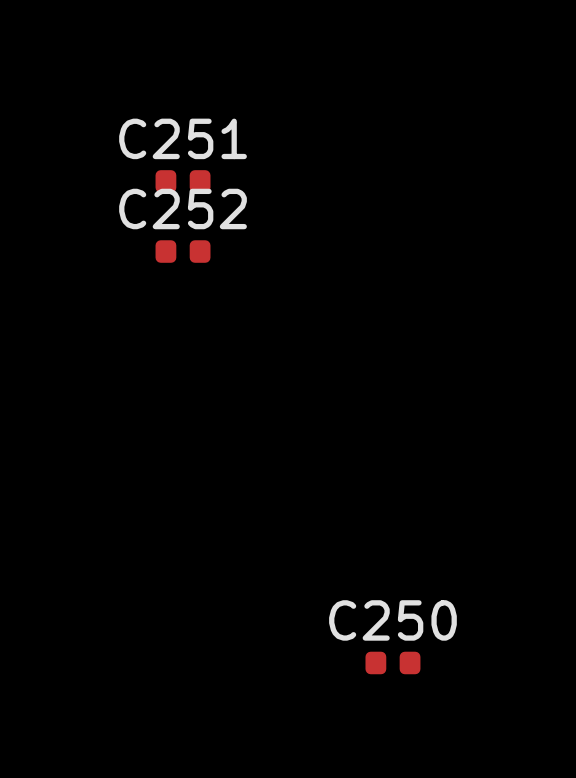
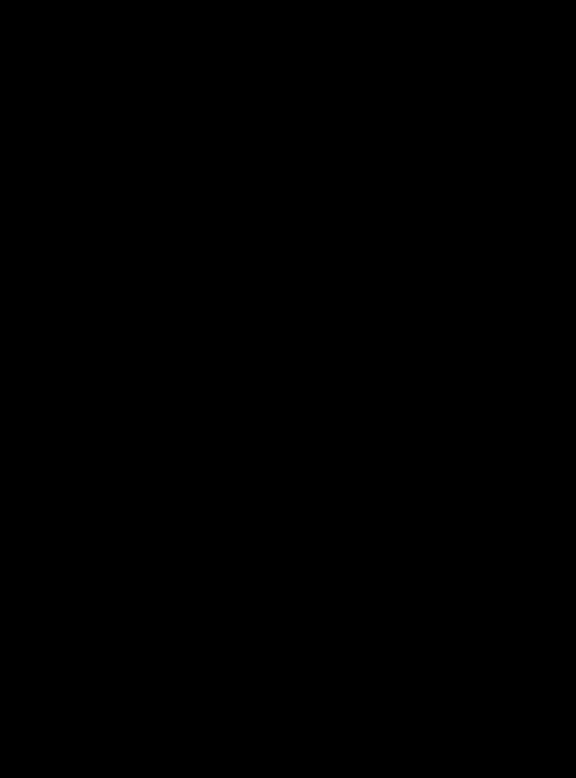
C251: (183, 181) -> none
C252: (183, 251) -> none
C250: (392, 662) -> none

